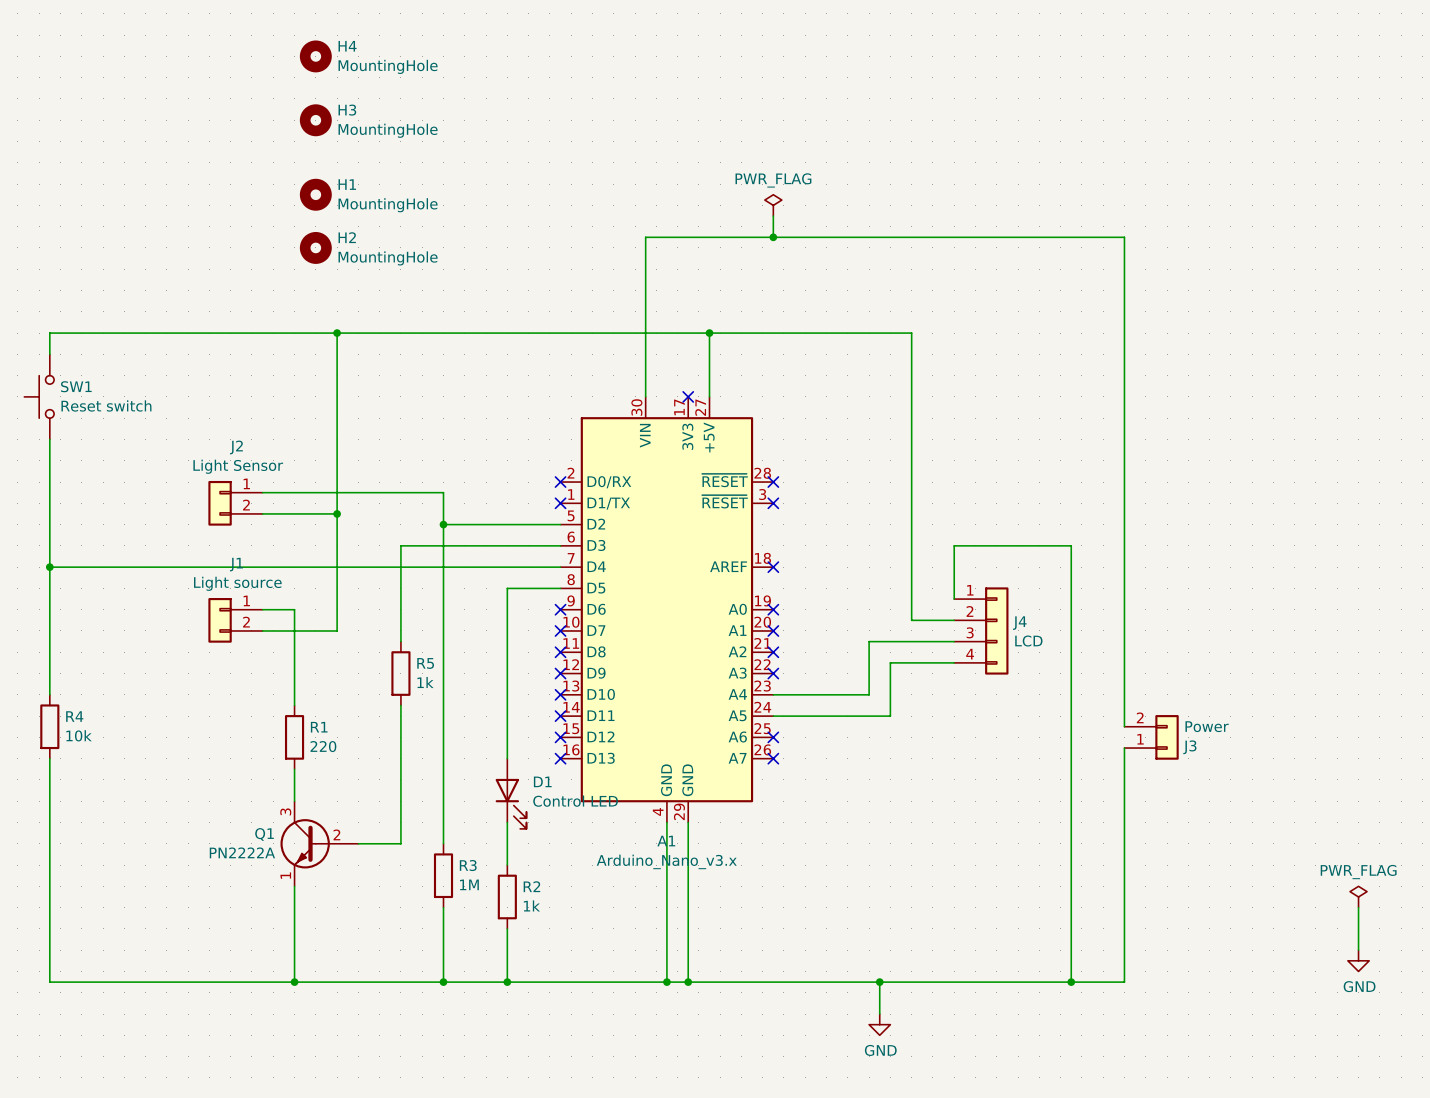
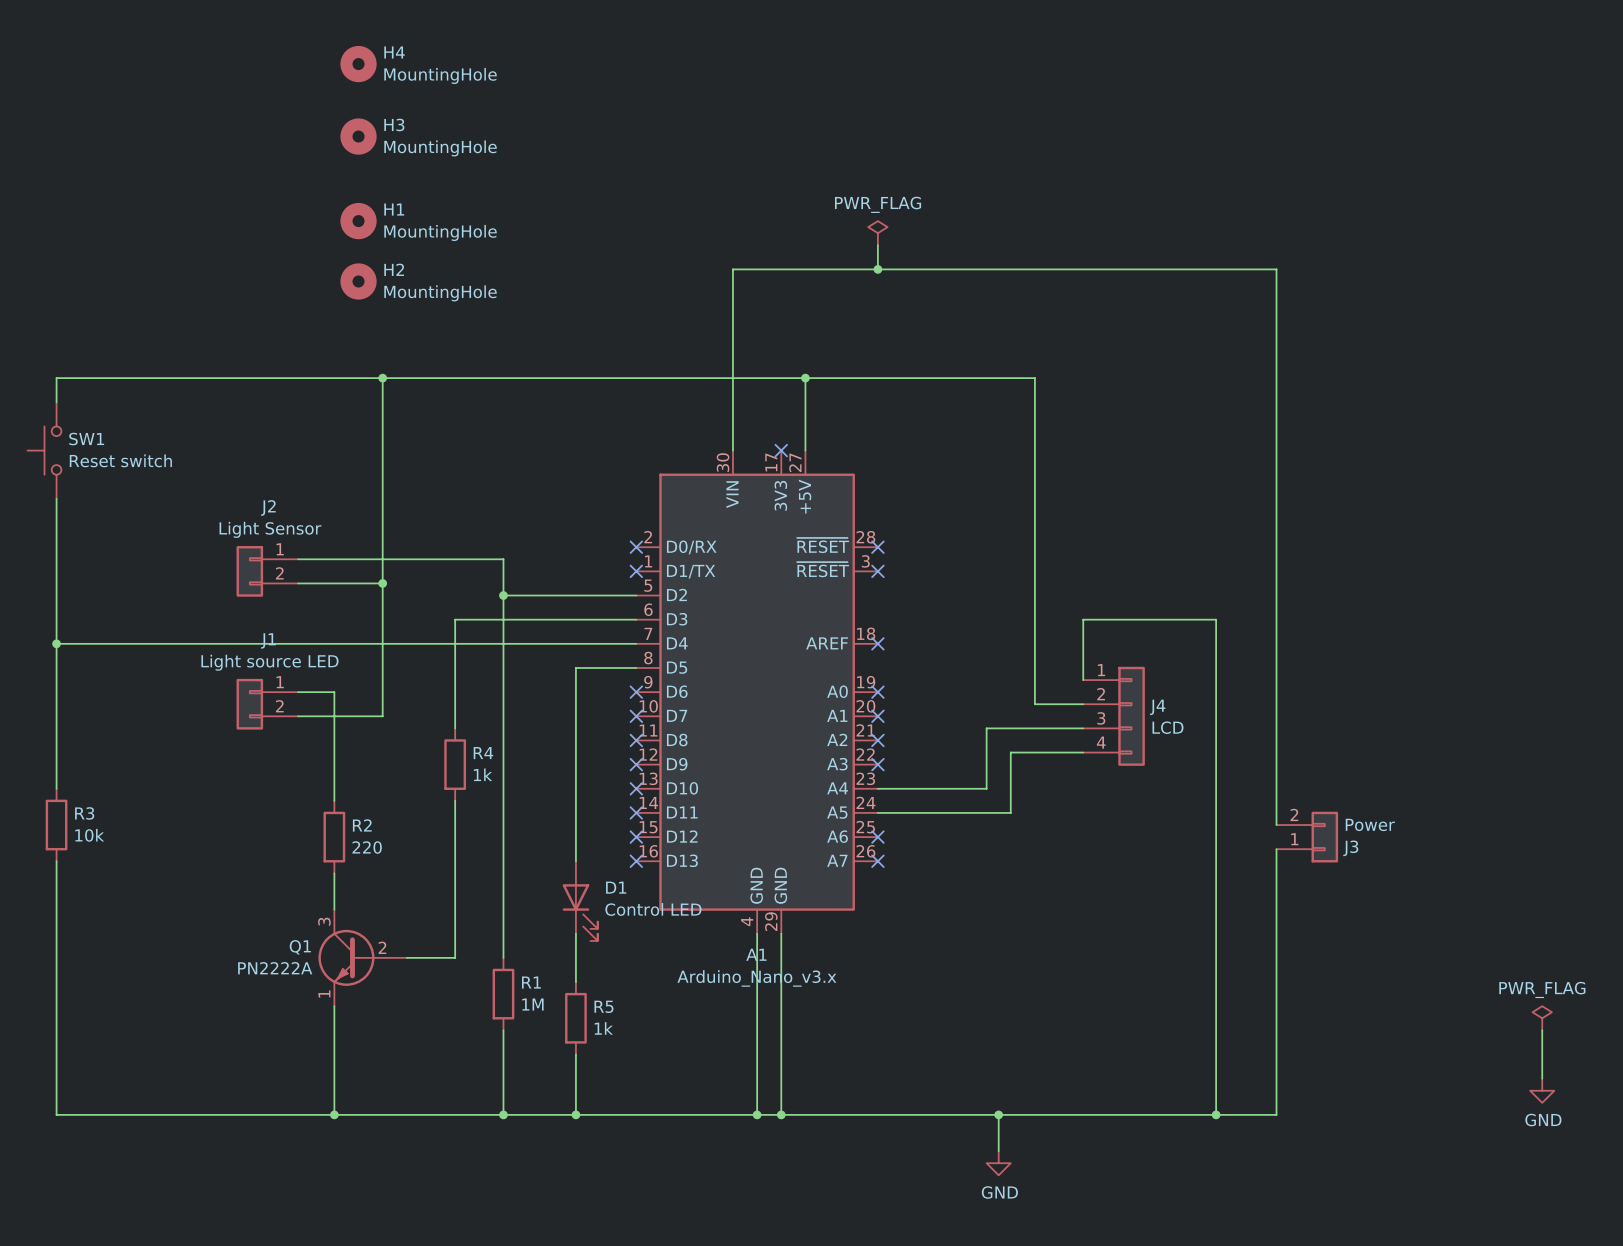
J1 value: Light source (237, 583) -> Light source LED (269, 662)
R5 name: R5 (425, 663) -> R4 (483, 753)
R4 name: R4 (74, 716) -> R3 (84, 813)
R1 name: R1 (319, 727) -> R2 (362, 825)
R3 name: R3 (468, 865) -> R1 (531, 982)
R2 name: R2 (531, 886) -> R5 (603, 1006)

